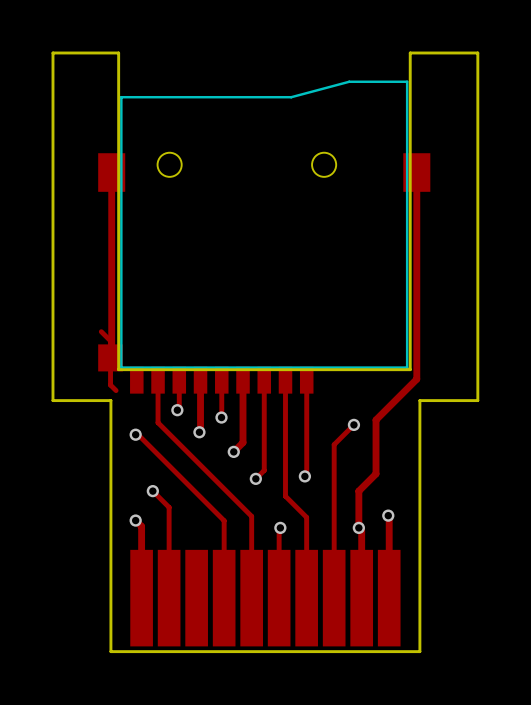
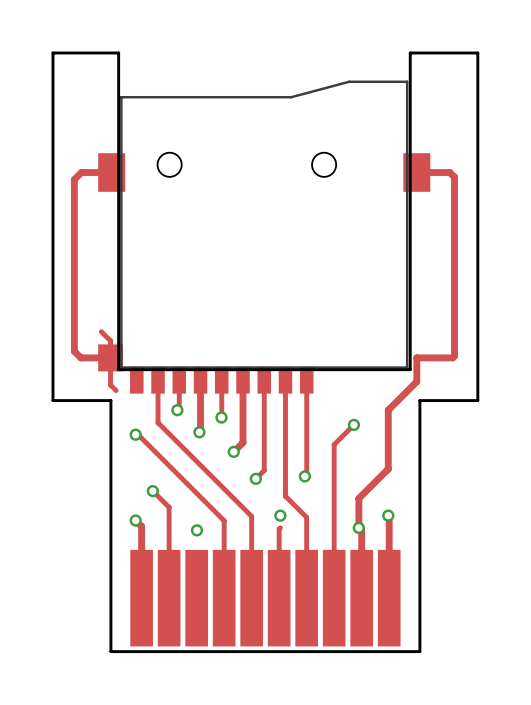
track: (111, 172) (111, 356) -> (111, 172) (81, 172) (74, 179) (74, 351) (80, 357) (110, 357)
track: (416, 172) (416, 357) -> (416, 172) (449, 172) (454, 177) (454, 356) (452, 357) (416, 357)
track: (416, 379) (376, 419) (376, 473) (358, 491) (358, 498) -> (416, 379) (416, 381) (388, 410) (388, 469) (358, 498)
via position: (280, 527) -> (280, 515)
via: none -> (196, 530)

